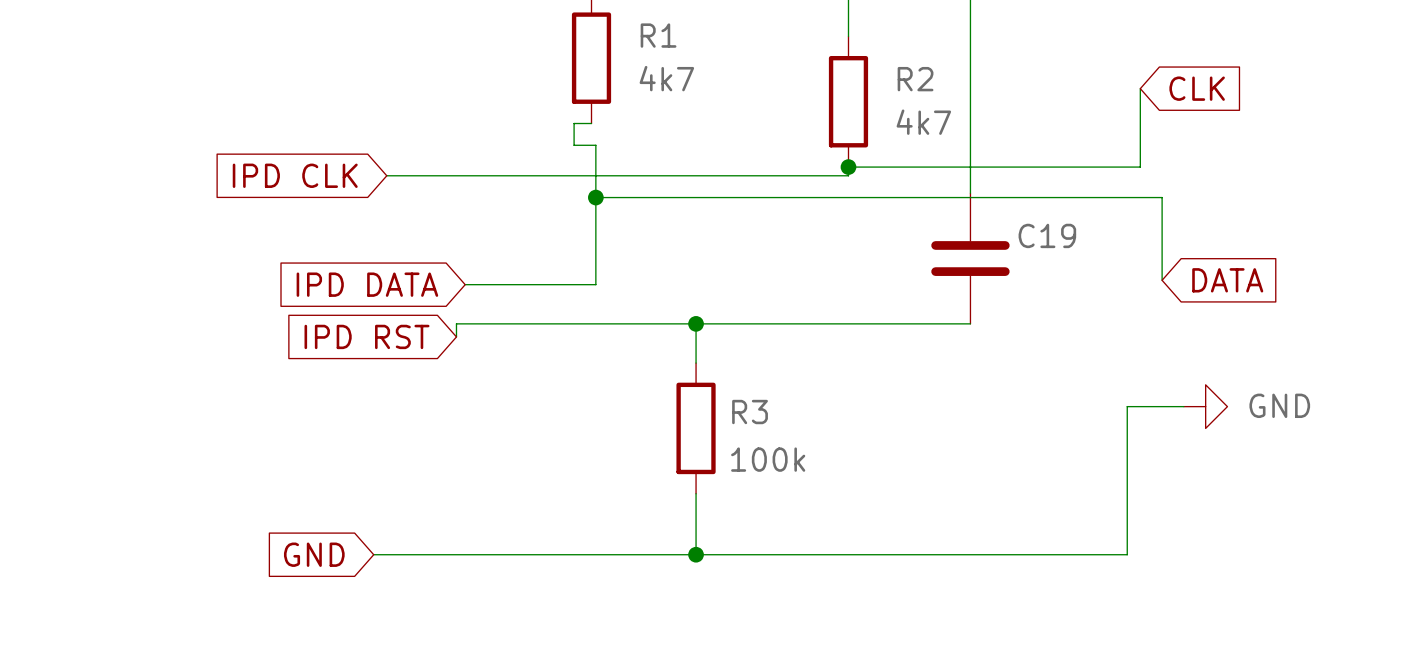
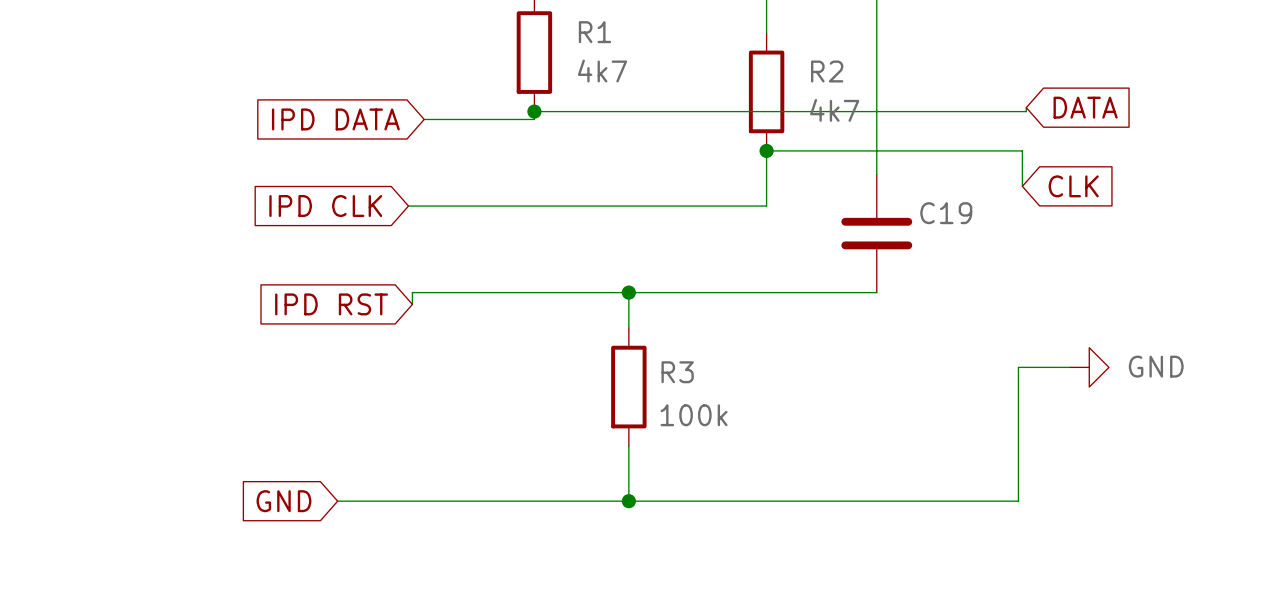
wire: (1140, 88) (1140, 167) (1131, 167) -> (1022, 186) (1022, 150)
global label position: CLK (1197, 88) -> CLK (1073, 186)
wire: none -> (1026, 107) (1026, 111) (534, 111) (534, 119) (424, 119)
wire: (591, 123) (574, 123) (574, 145) (595, 145) (595, 284) (465, 284) -> none
global label position: IPD CLK (295, 175) -> IPD CLK (325, 206)
wire: (386, 175) (848, 175) -> (408, 206) (766, 206) (766, 158)
wire: (595, 197) (1162, 197) (1162, 280) -> none
junction position: (595, 197) -> (534, 111)
global label position: DATA (1227, 280) -> DATA (1085, 107)
global label position: IPD DATA (367, 284) -> IPD DATA (335, 119)

